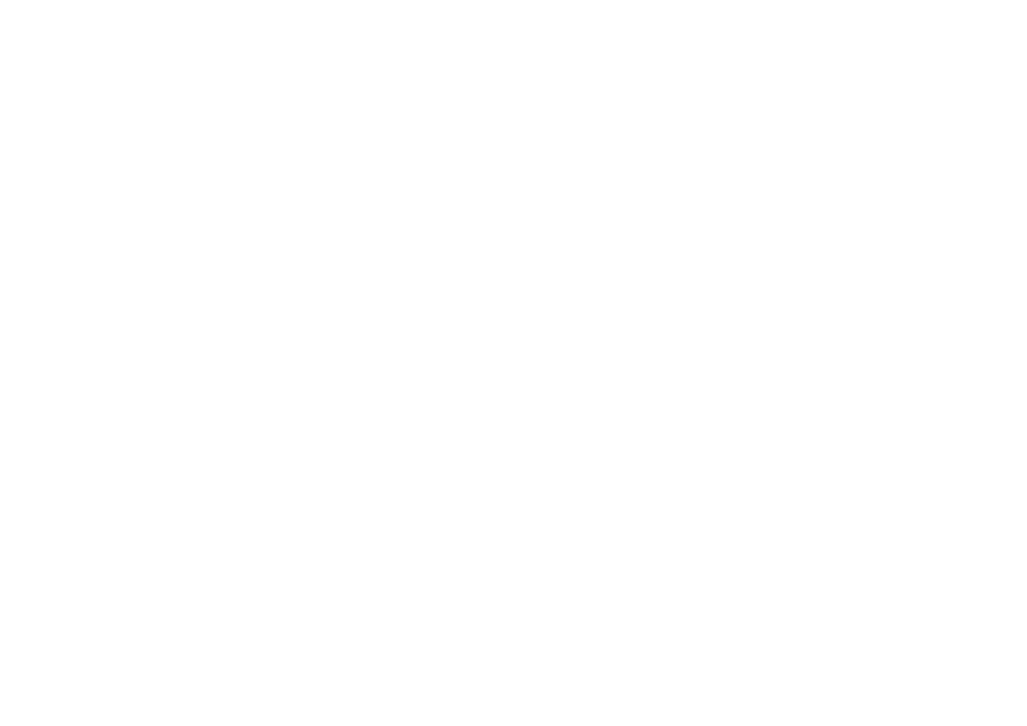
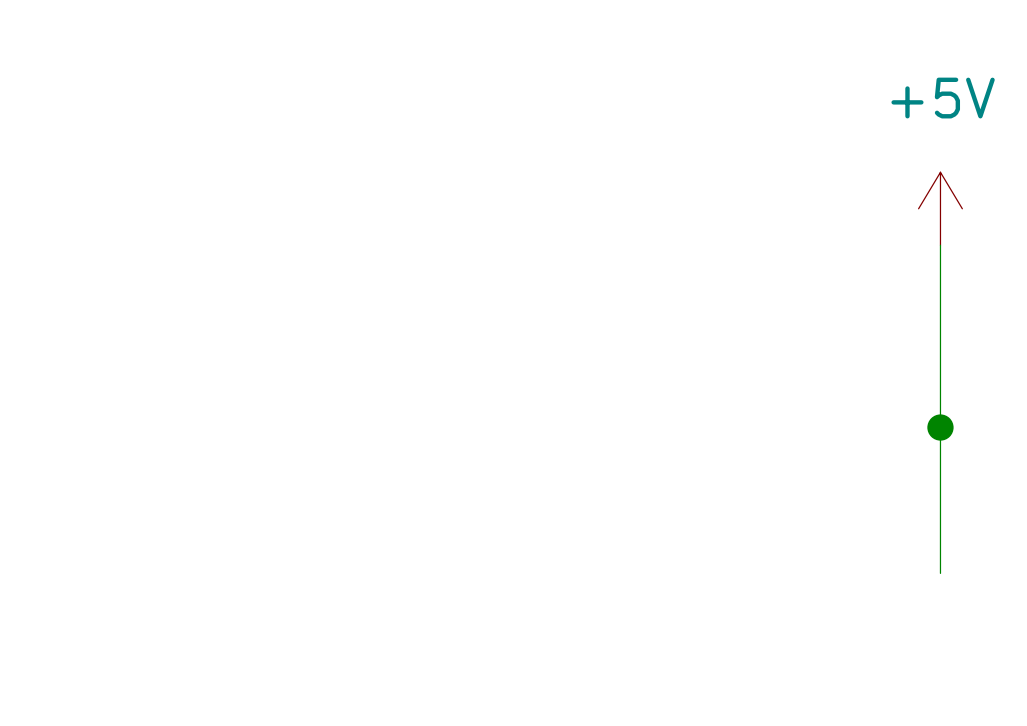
power symbol: none -> +5V (940, 208)
wire: none -> (940, 245) (940, 573)
junction: none -> (940, 427)

